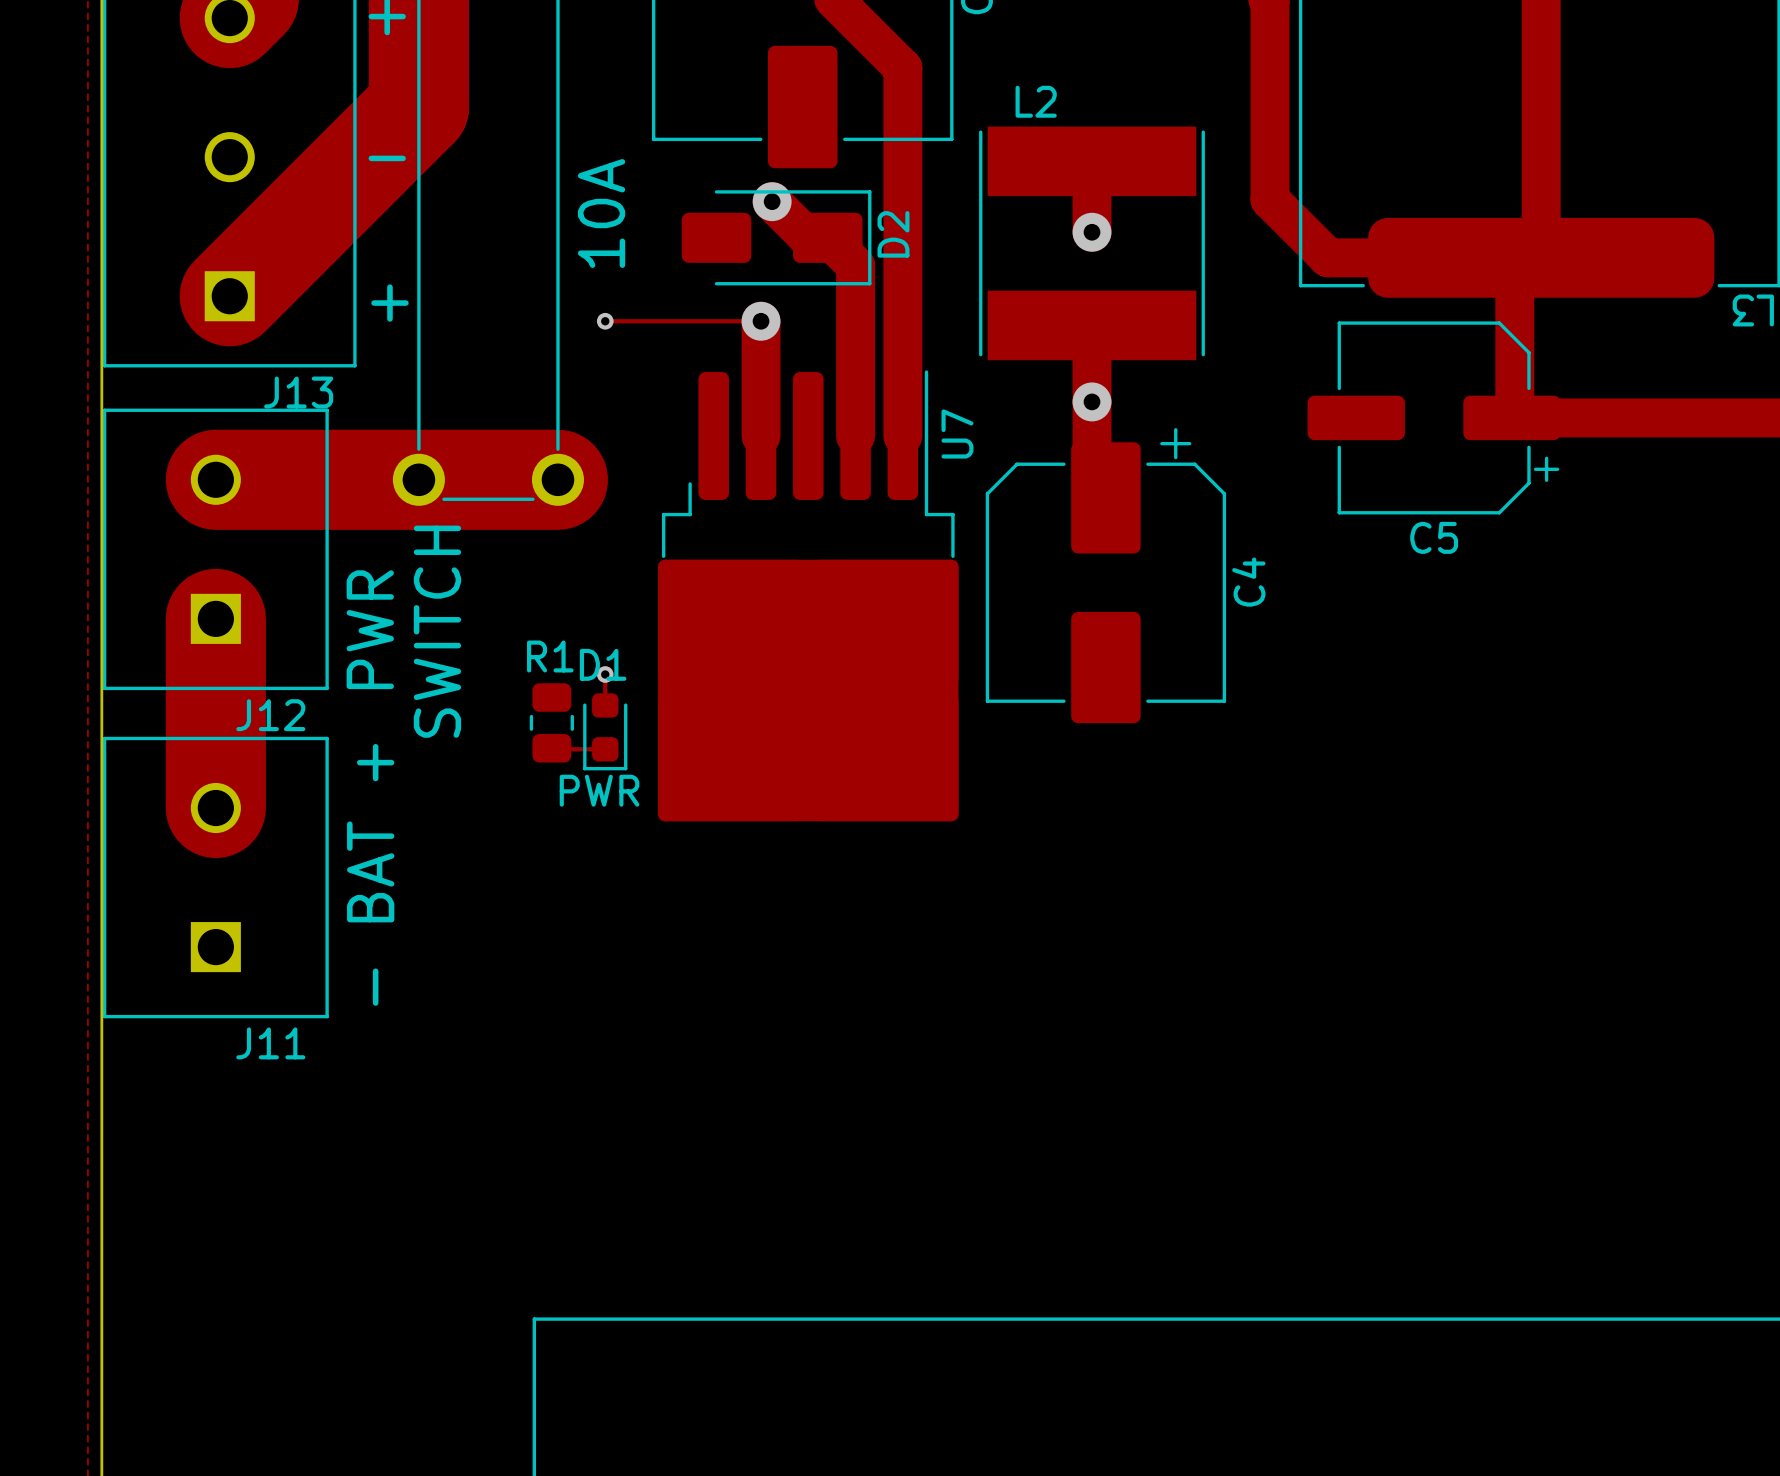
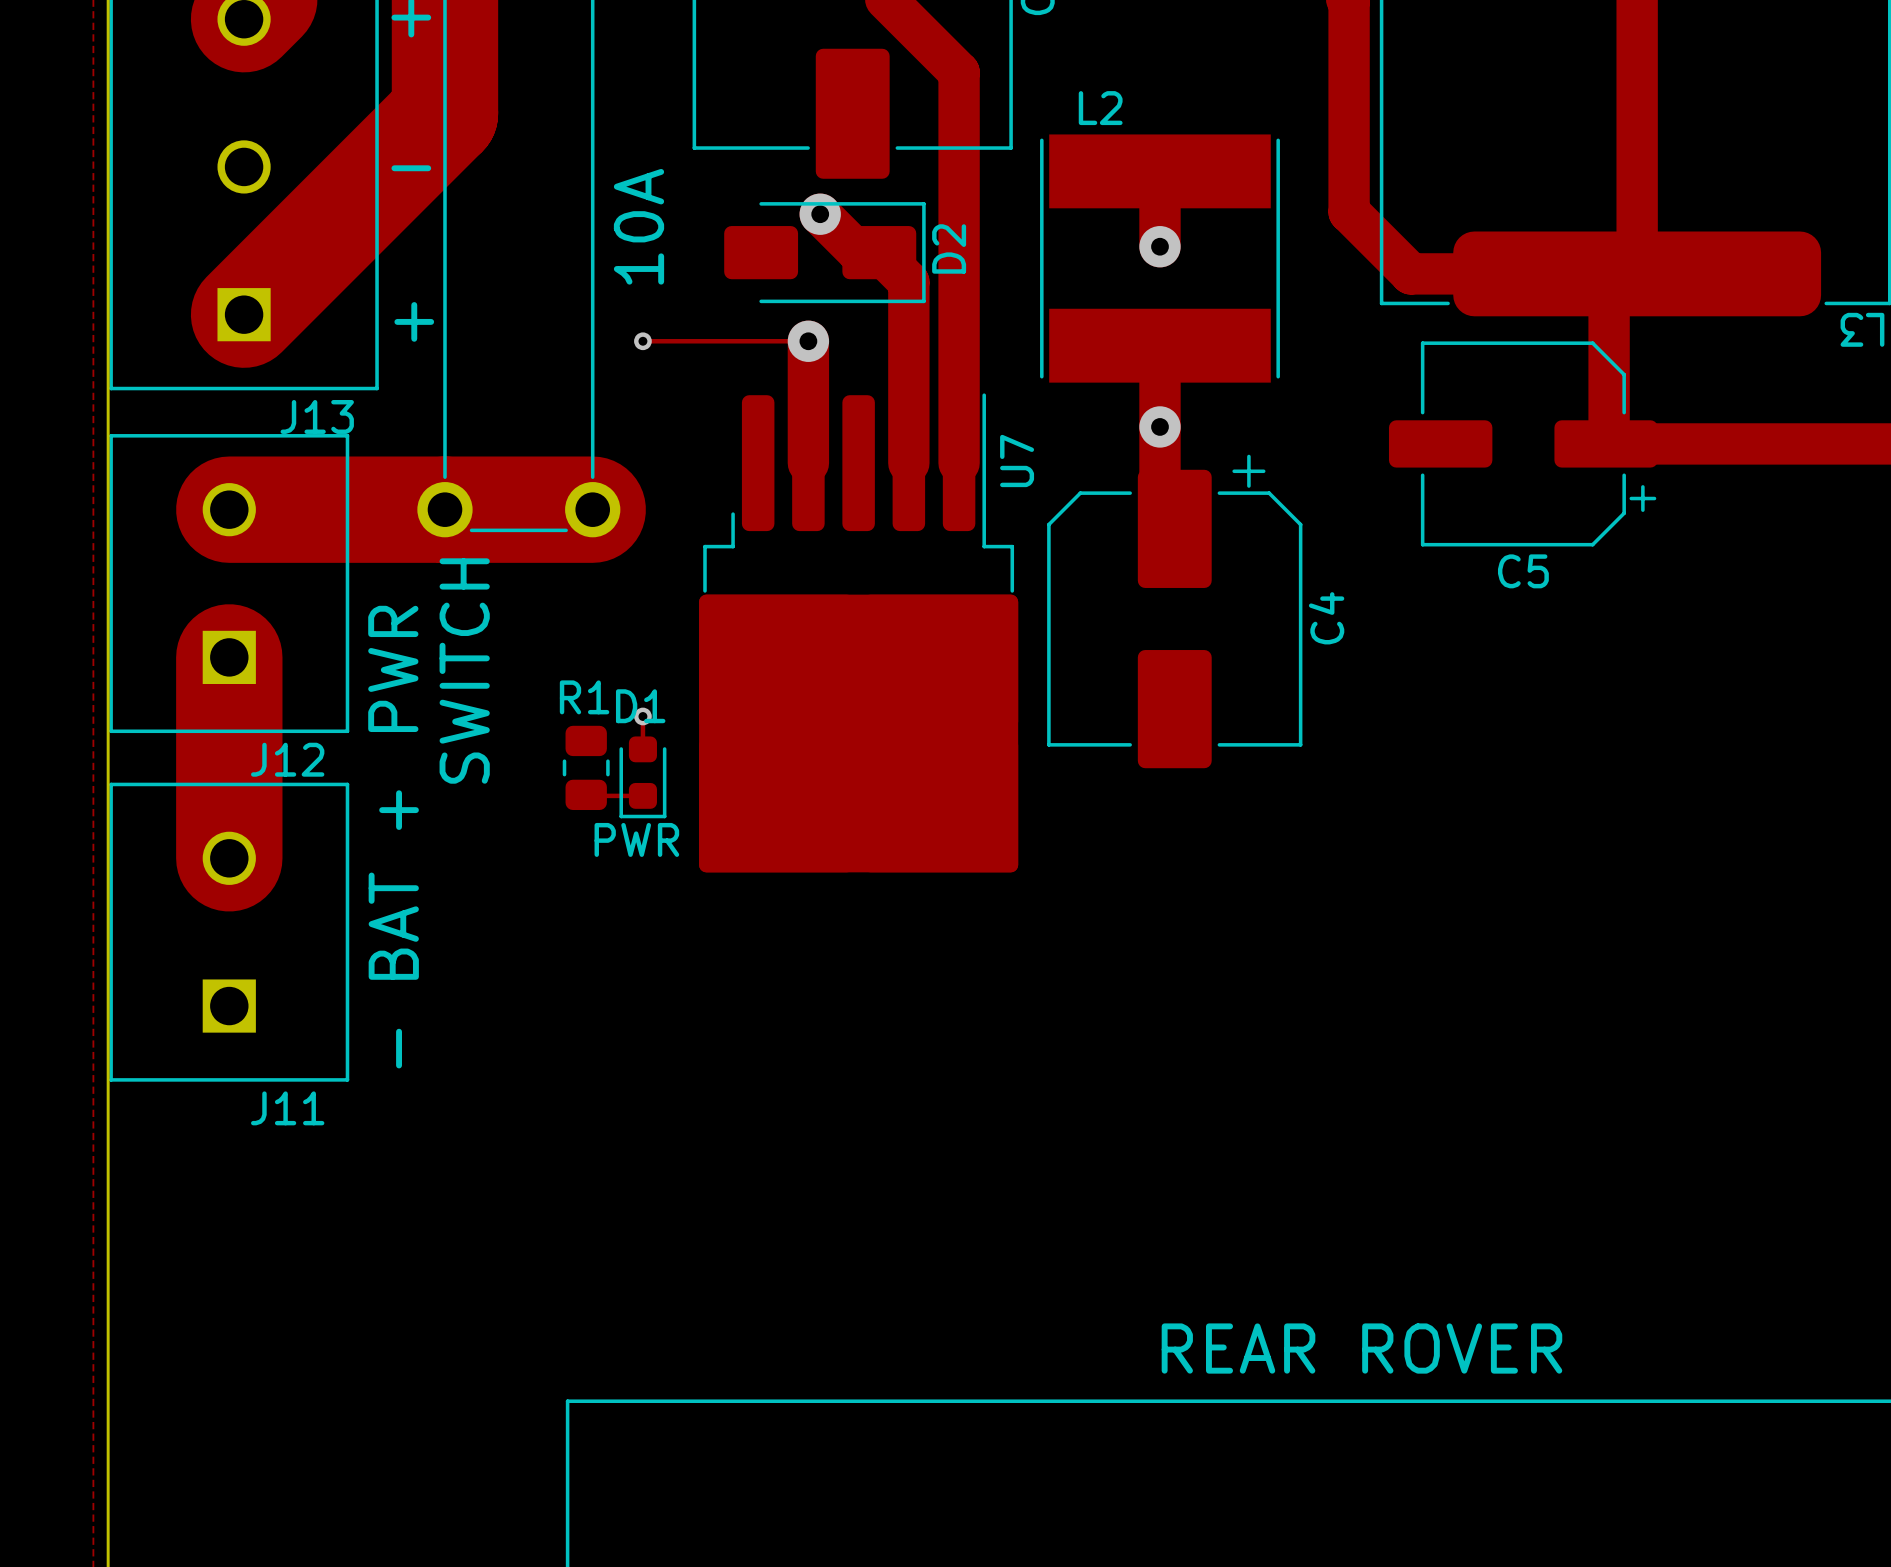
text: none -> REAR ROVER (1361, 1348)

